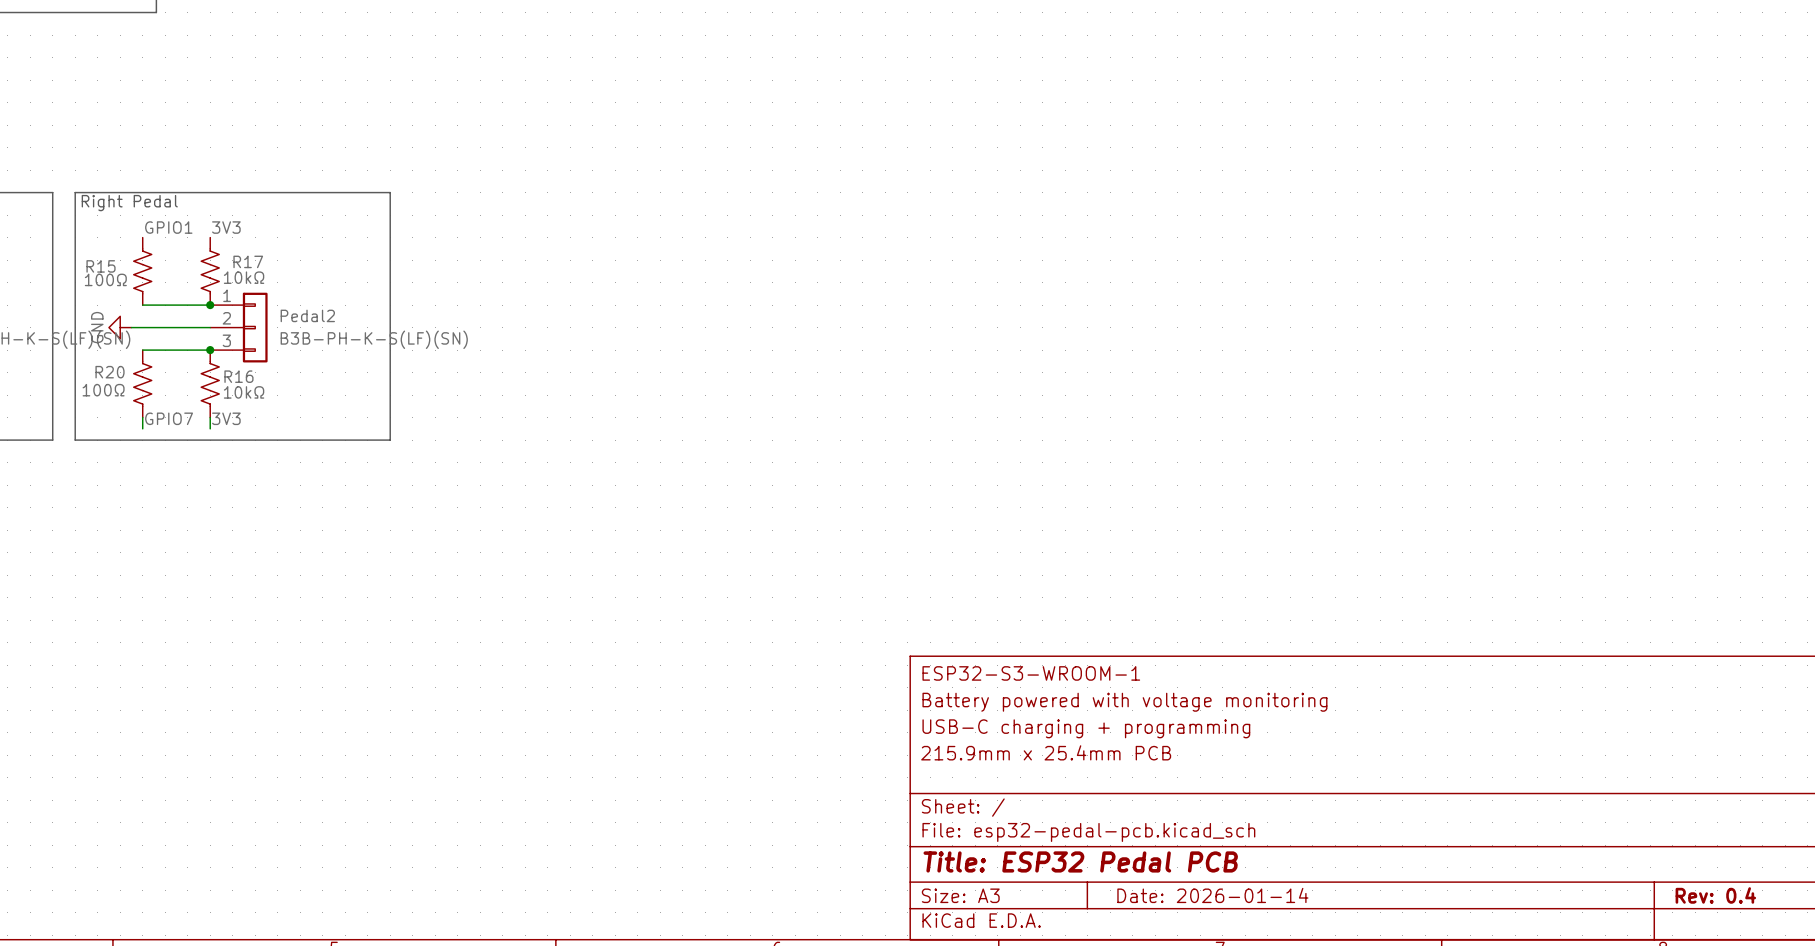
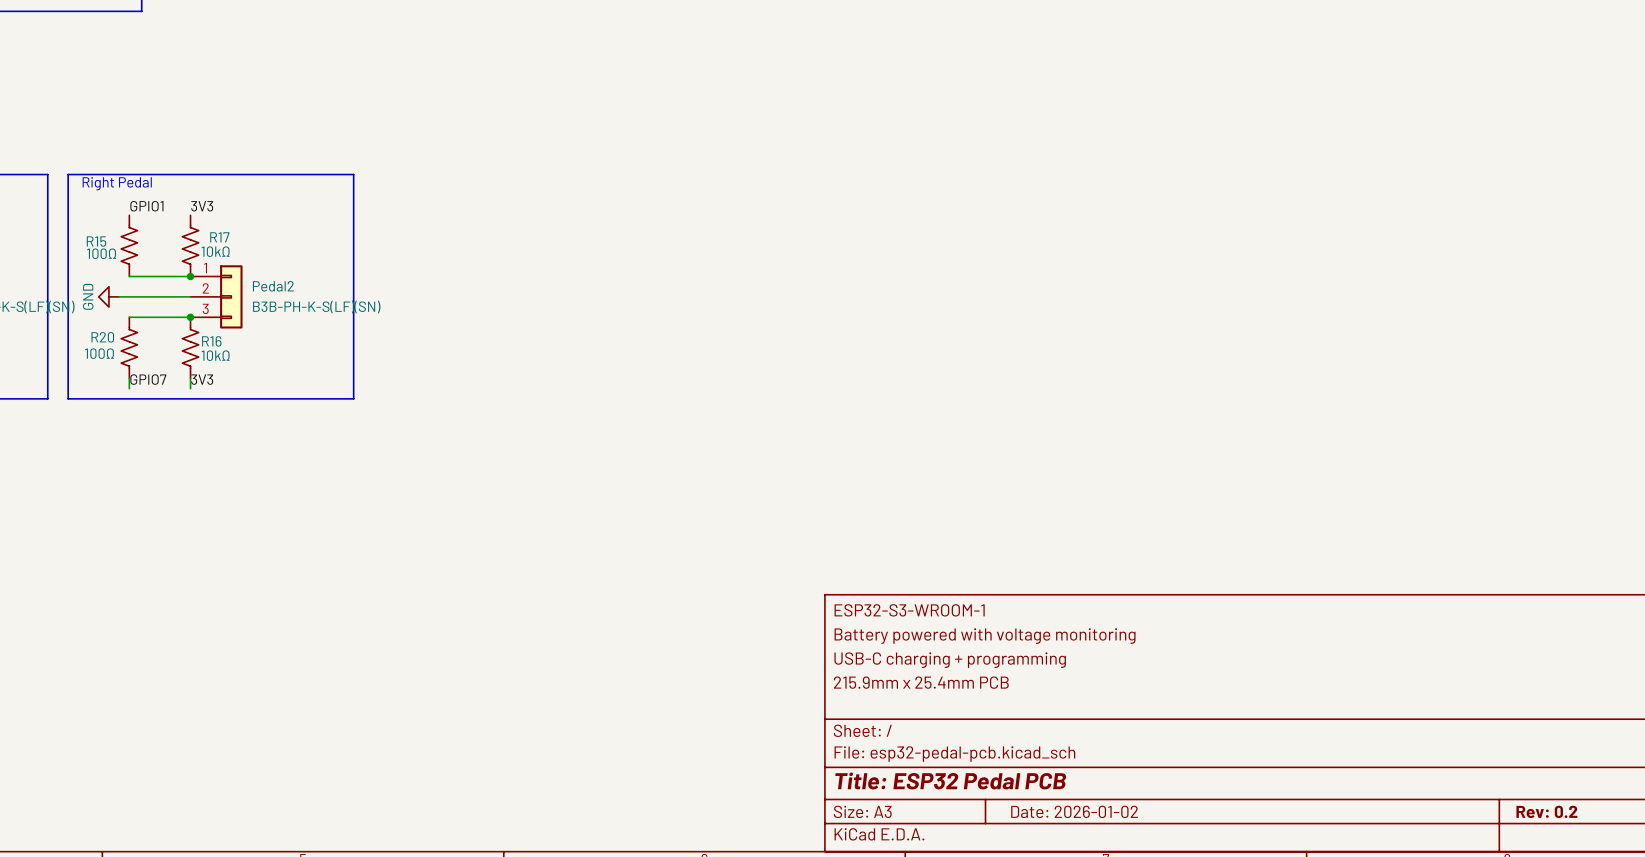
title block: Date: 2026-01-14 (1212, 895) -> Date: 2026-01-02 (1074, 811)
title block: Rev: 0.4 (1715, 895) -> Rev: 0.2 (1546, 811)

